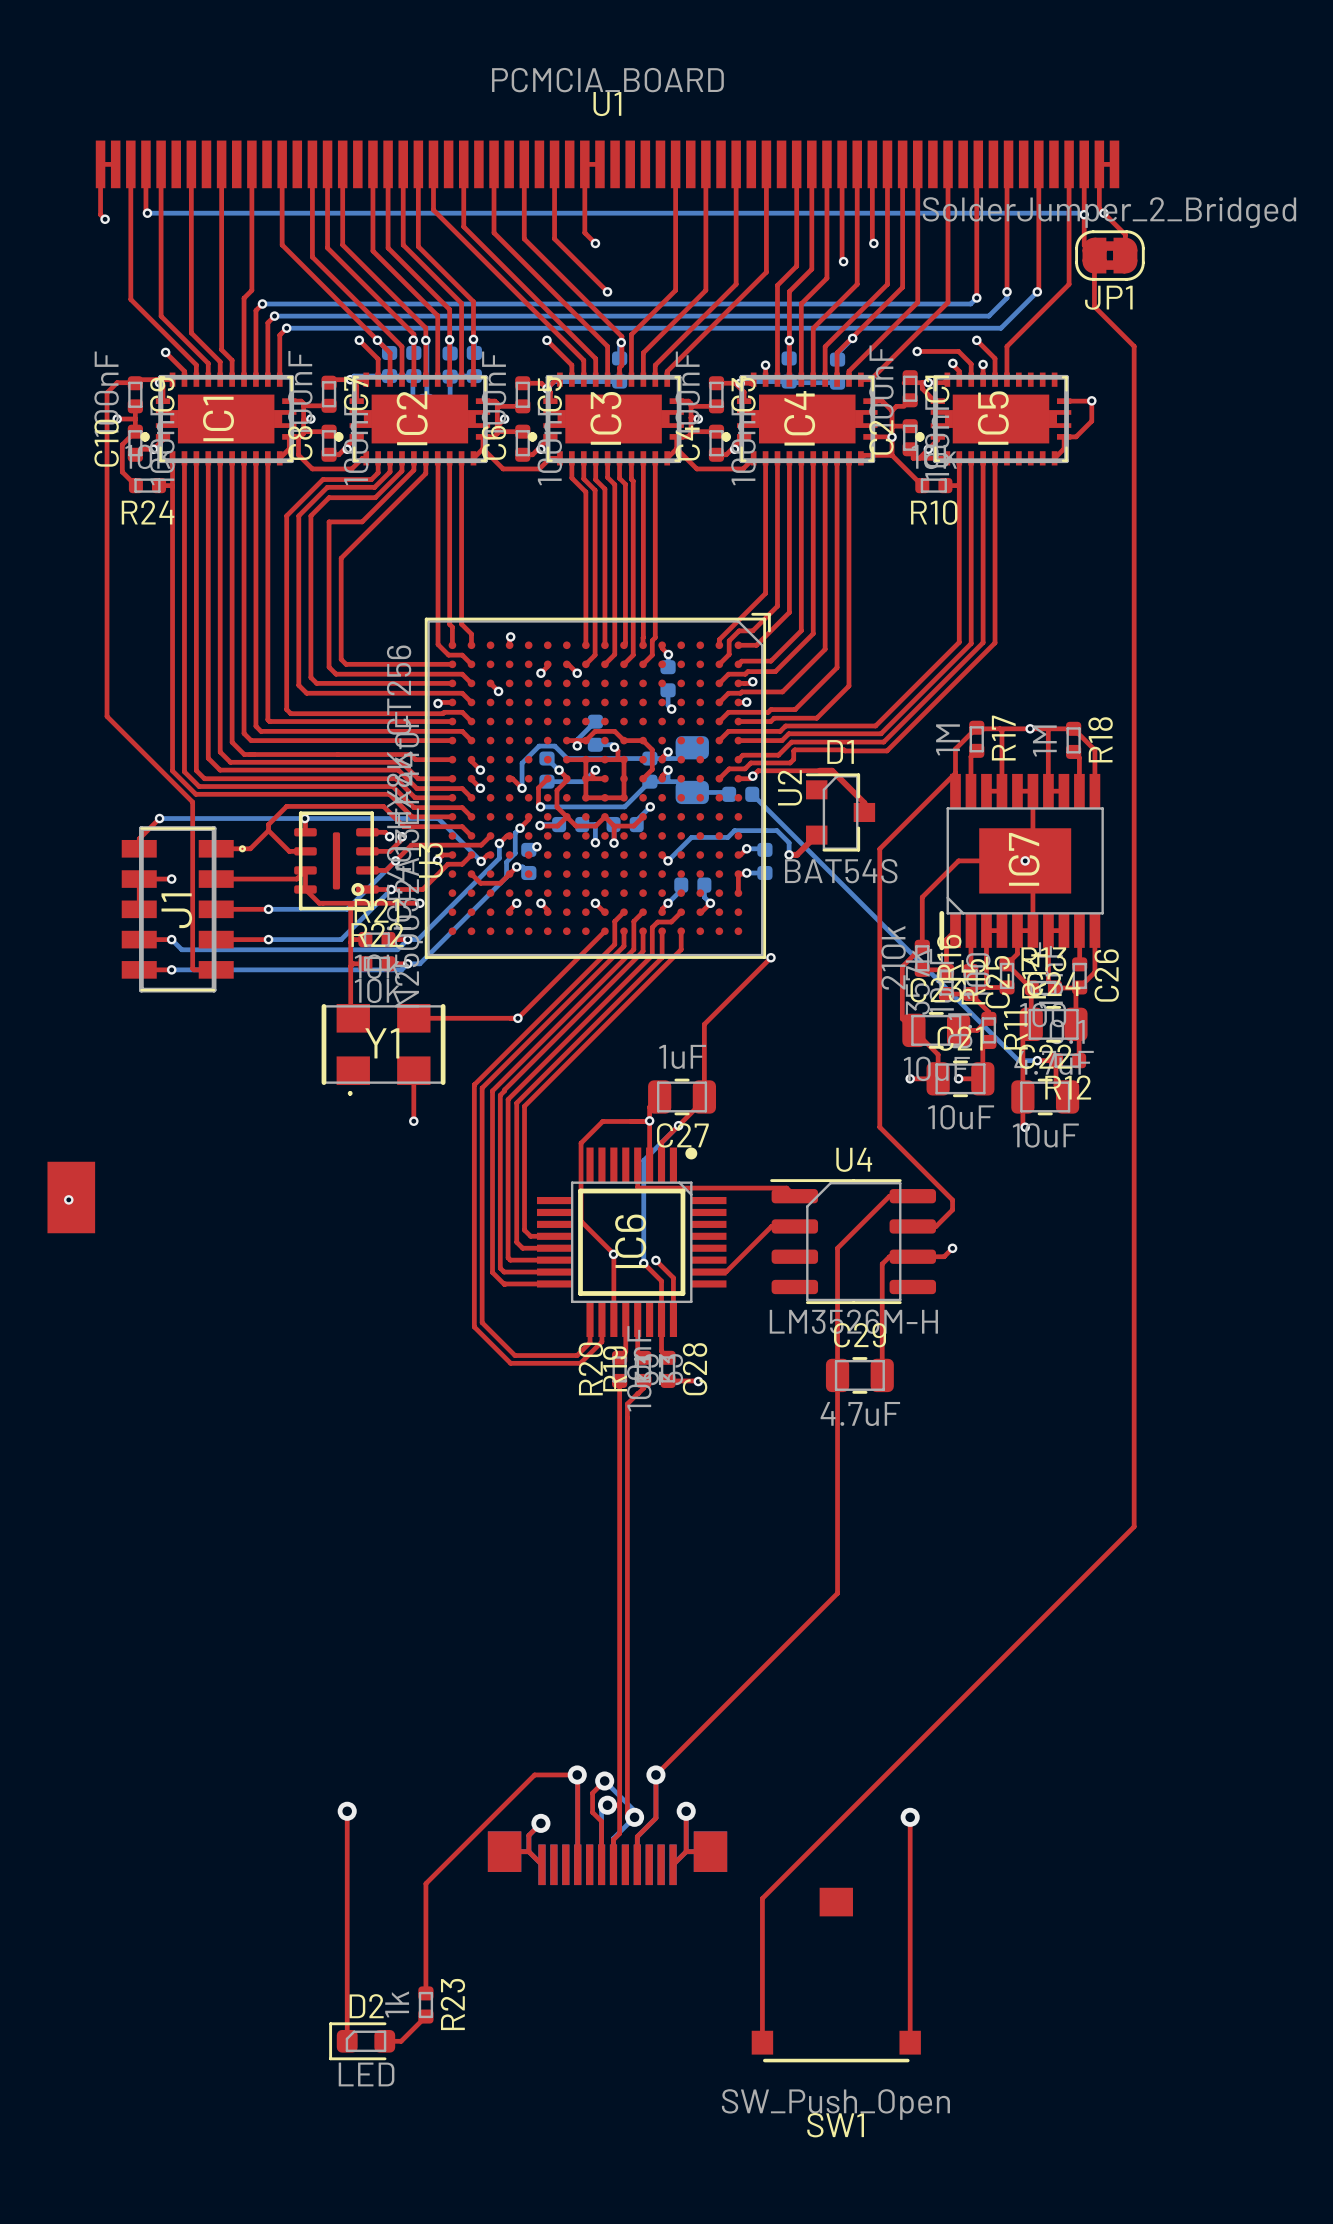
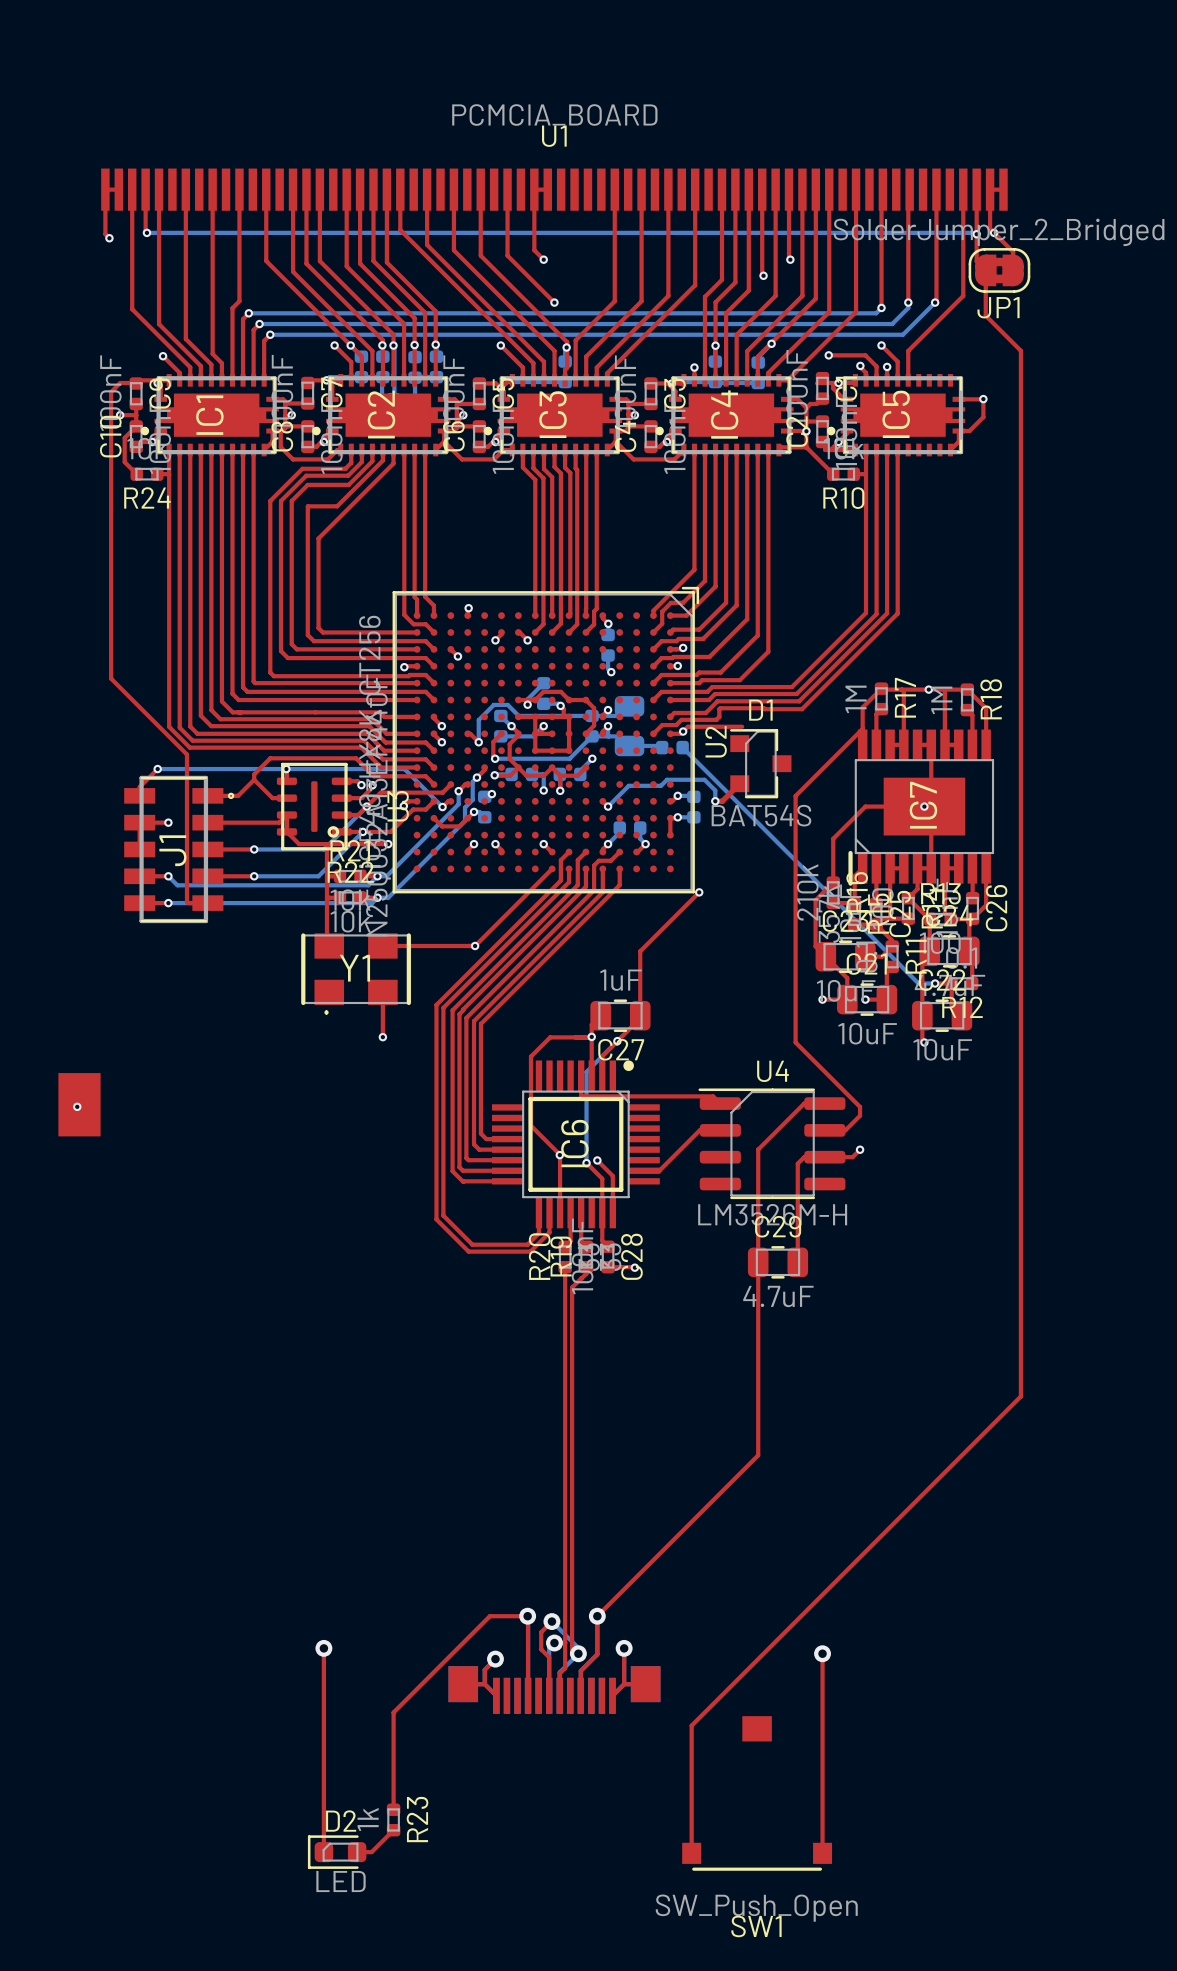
top track: (819, 770) (832, 770) (864, 803) (864, 812) -> none

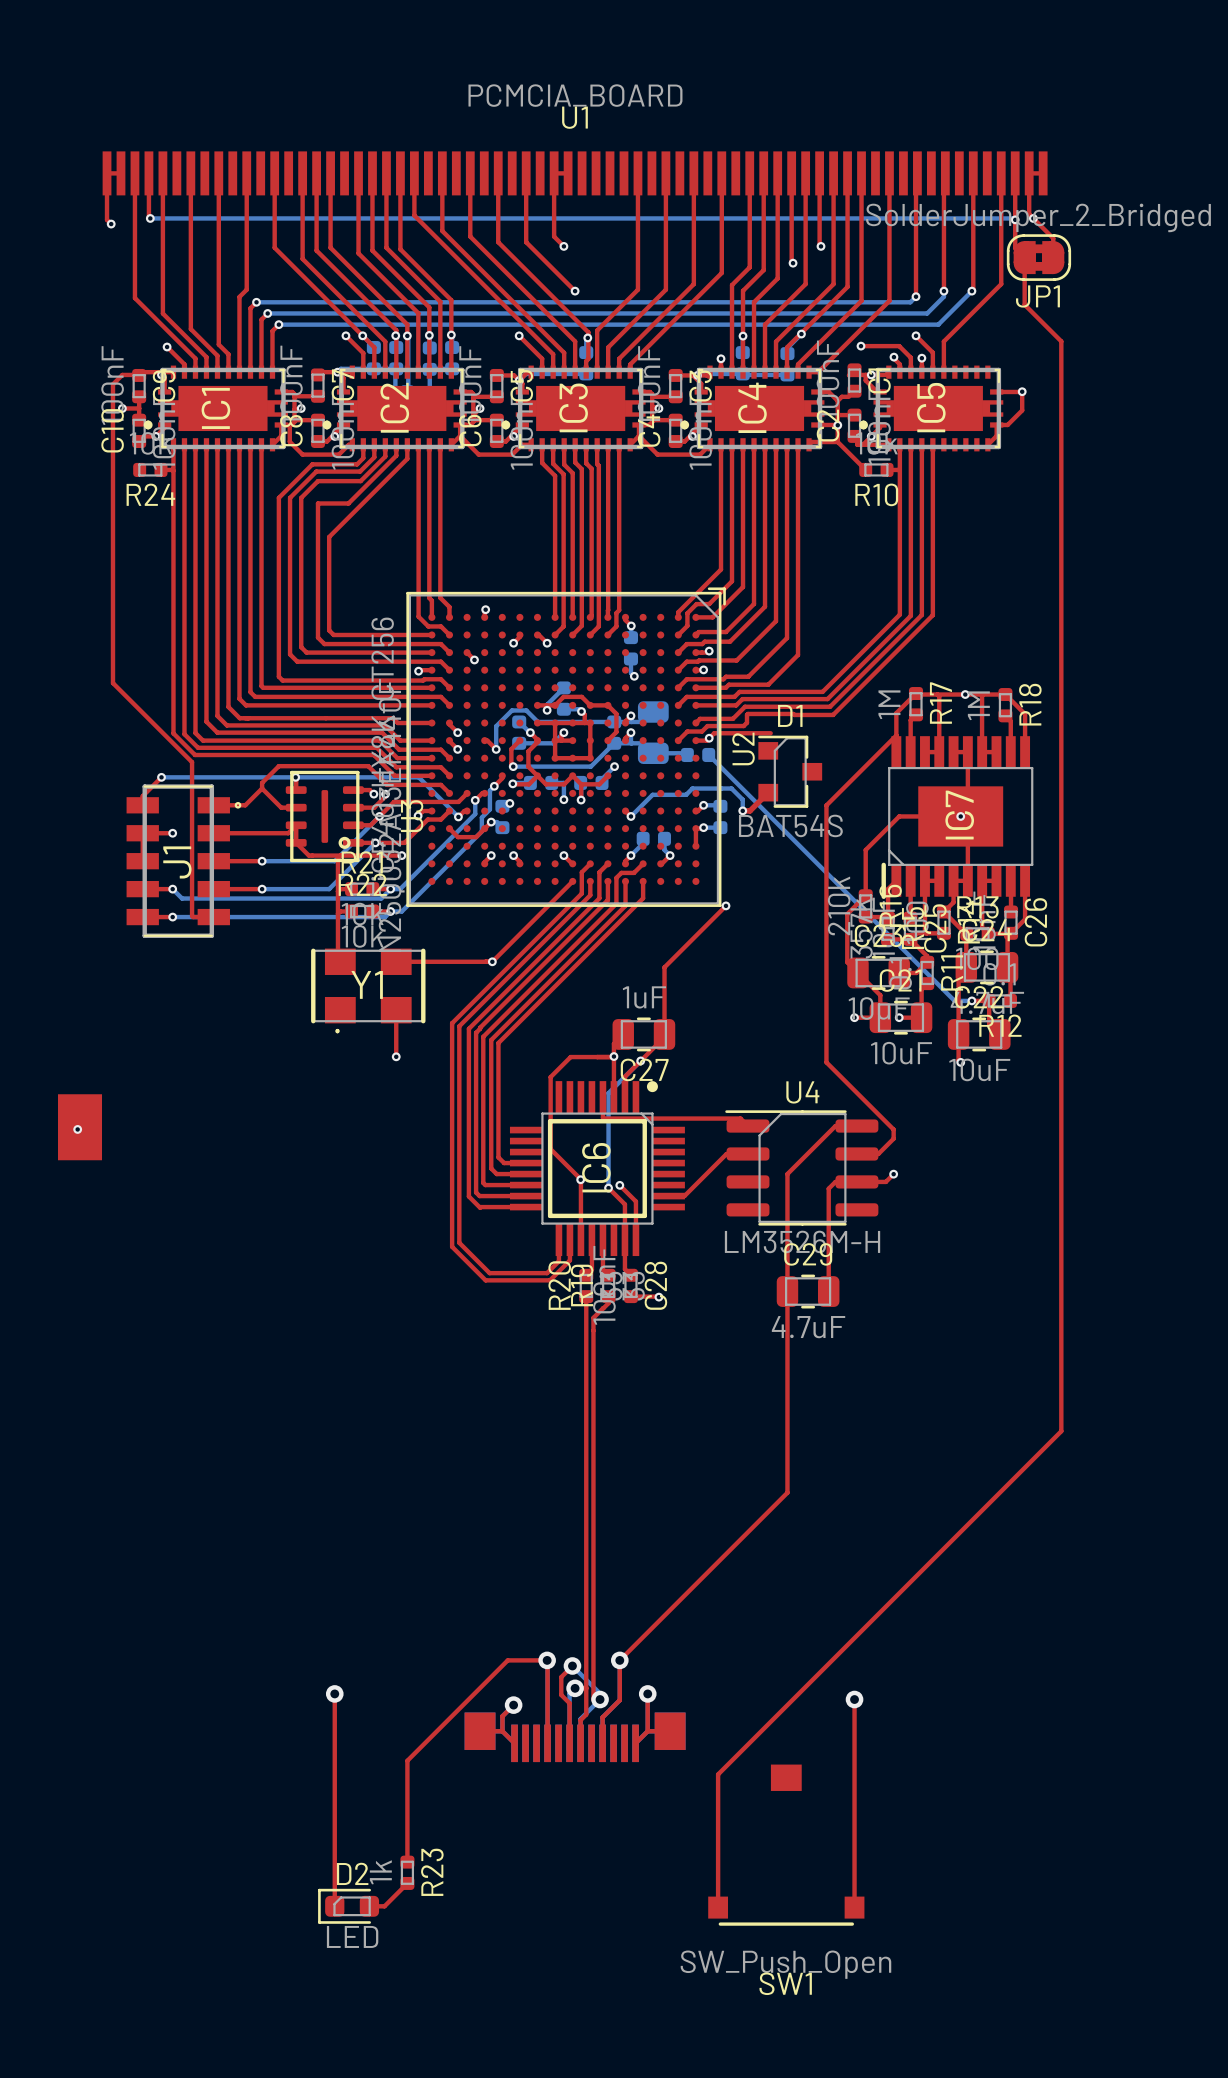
top track: (136, 426) (124, 437) (124, 462) (136, 474) -> none

